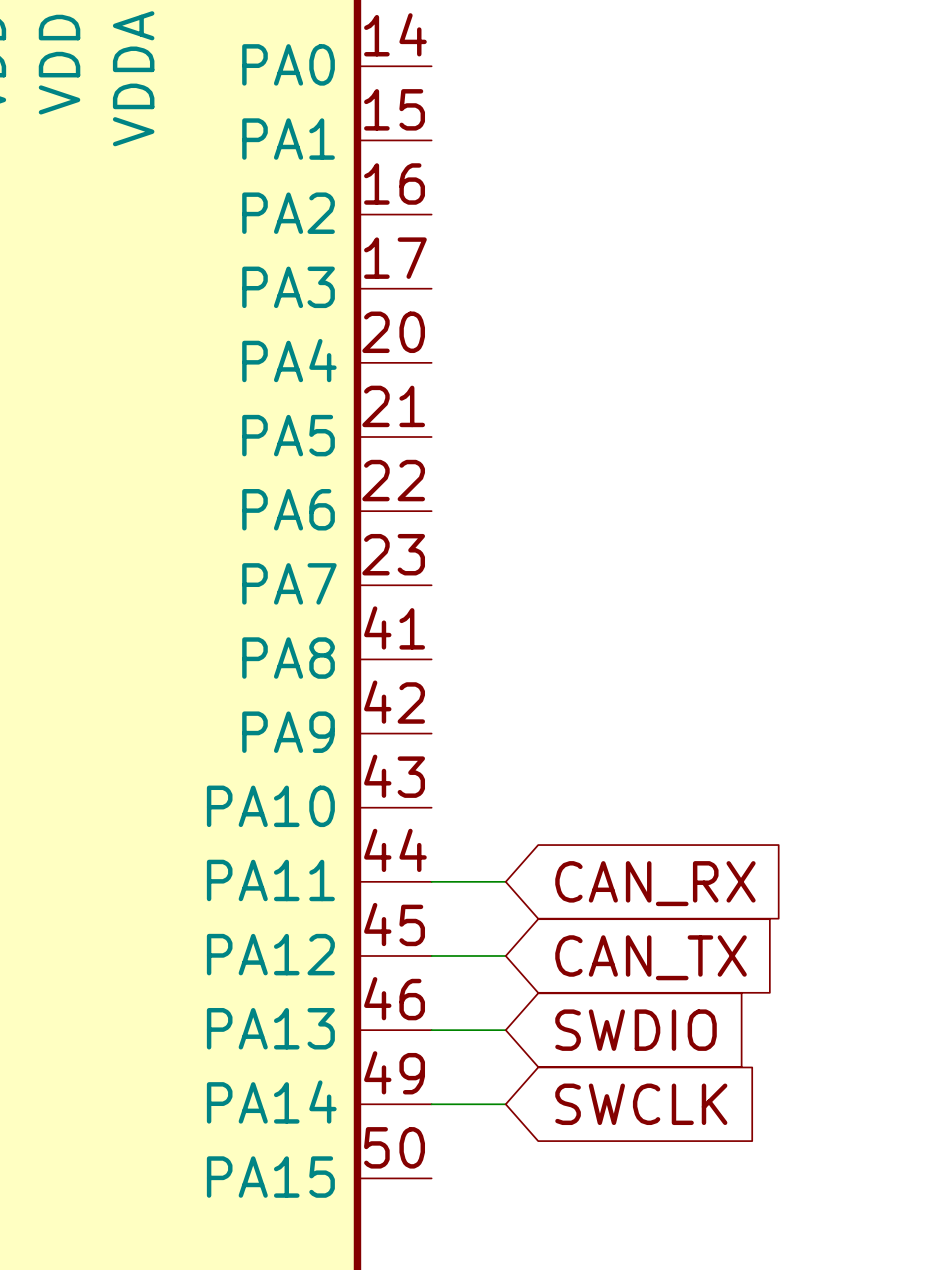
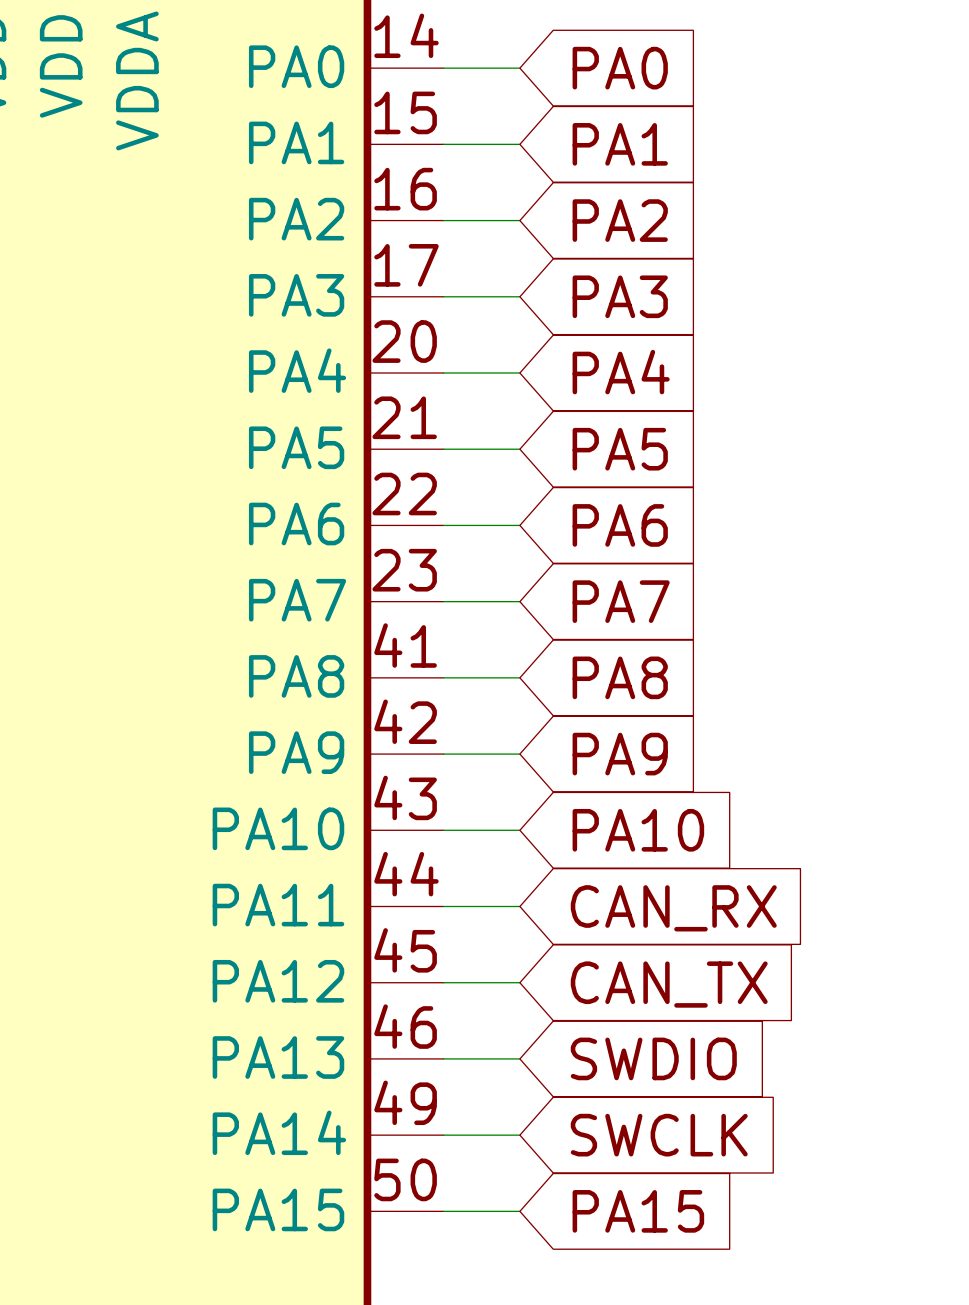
wire: none -> (443, 68) (519, 68)
global label: none -> PA0 (620, 68)
wire: none -> (443, 144) (519, 144)
global label: none -> PA1 (620, 144)
wire: none -> (443, 220) (519, 220)
global label: none -> PA2 (620, 220)
wire: none -> (443, 296) (519, 296)
global label: none -> PA3 (620, 296)
global label: none -> PA4 (621, 372)
wire: none -> (443, 373) (519, 373)
wire: none -> (443, 449) (519, 449)
global label: none -> PA5 (620, 449)
wire: none -> (443, 525) (519, 525)
global label: none -> PA6 (620, 525)
wire: none -> (443, 601) (519, 601)
global label: none -> PA7 (621, 601)
wire: none -> (443, 677) (519, 677)
global label: none -> PA8 (620, 677)
wire: none -> (443, 754) (519, 754)
global label: none -> PA9 (620, 754)
wire: none -> (443, 830) (519, 830)
global label: none -> PA10 (638, 830)
wire: none -> (443, 1211) (519, 1211)
global label: none -> PA15 (638, 1211)

